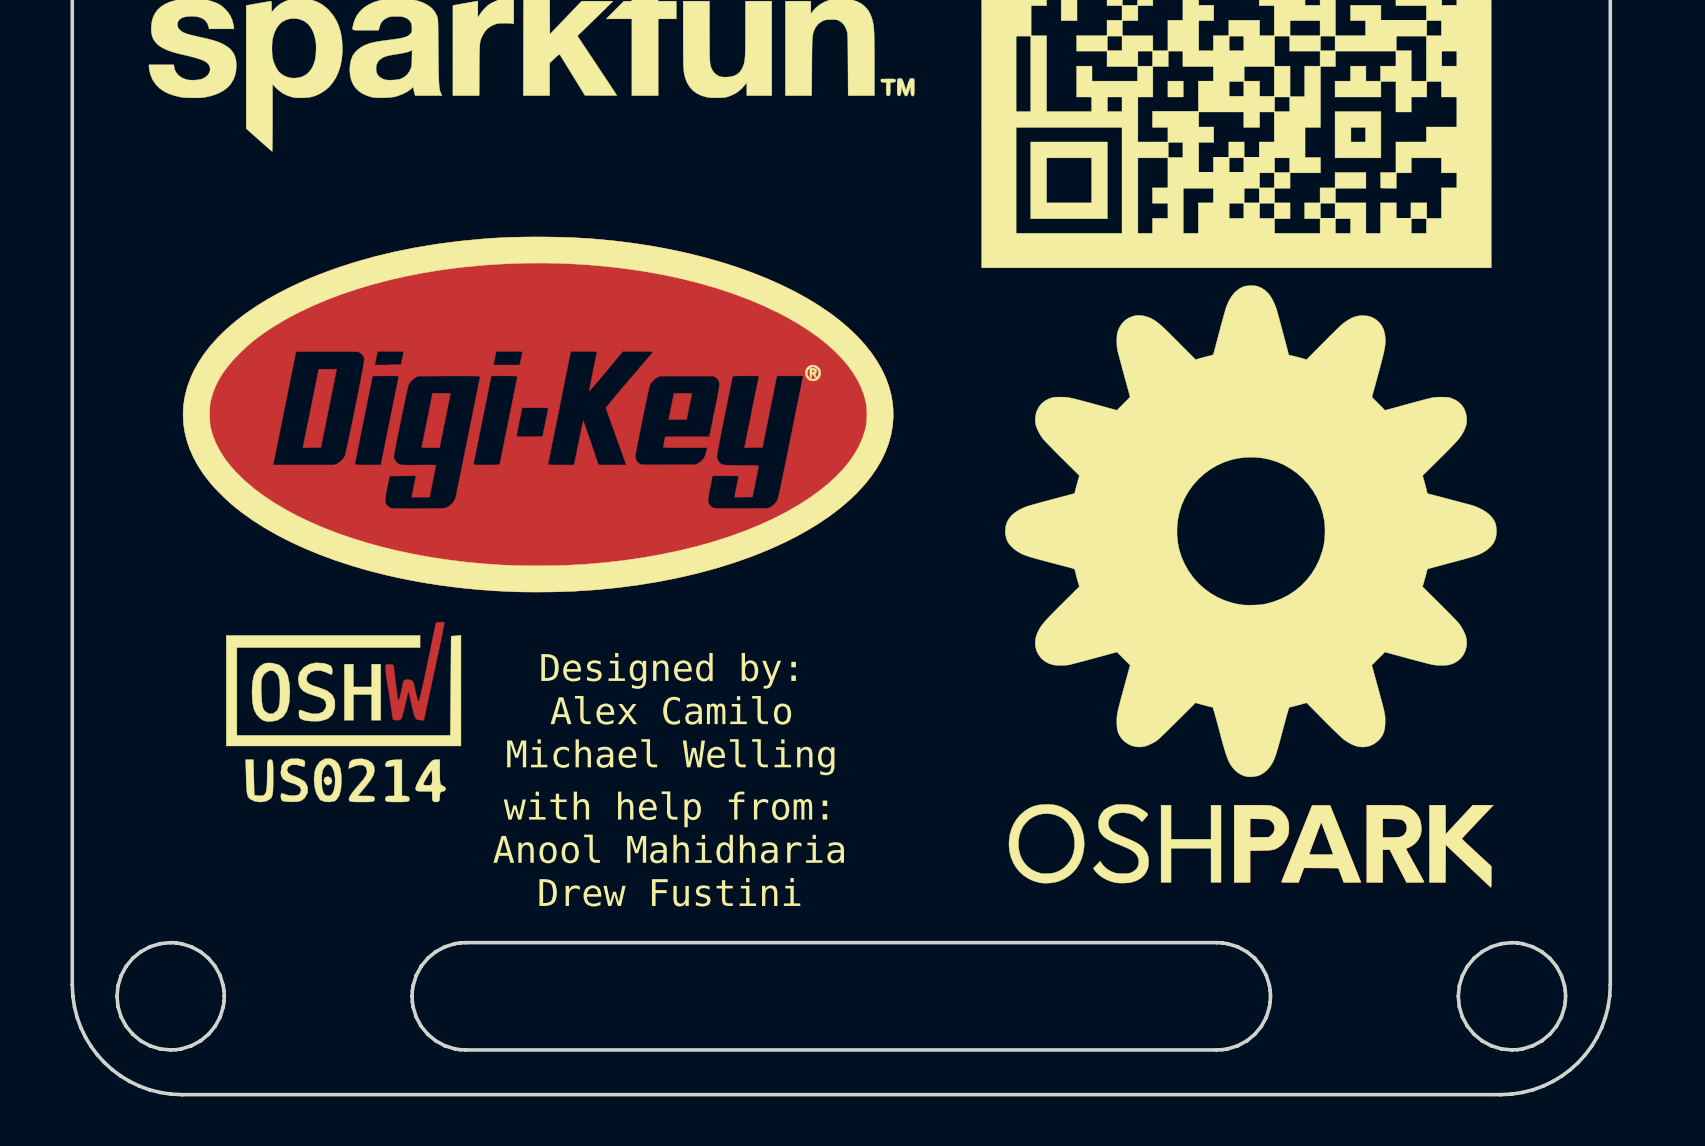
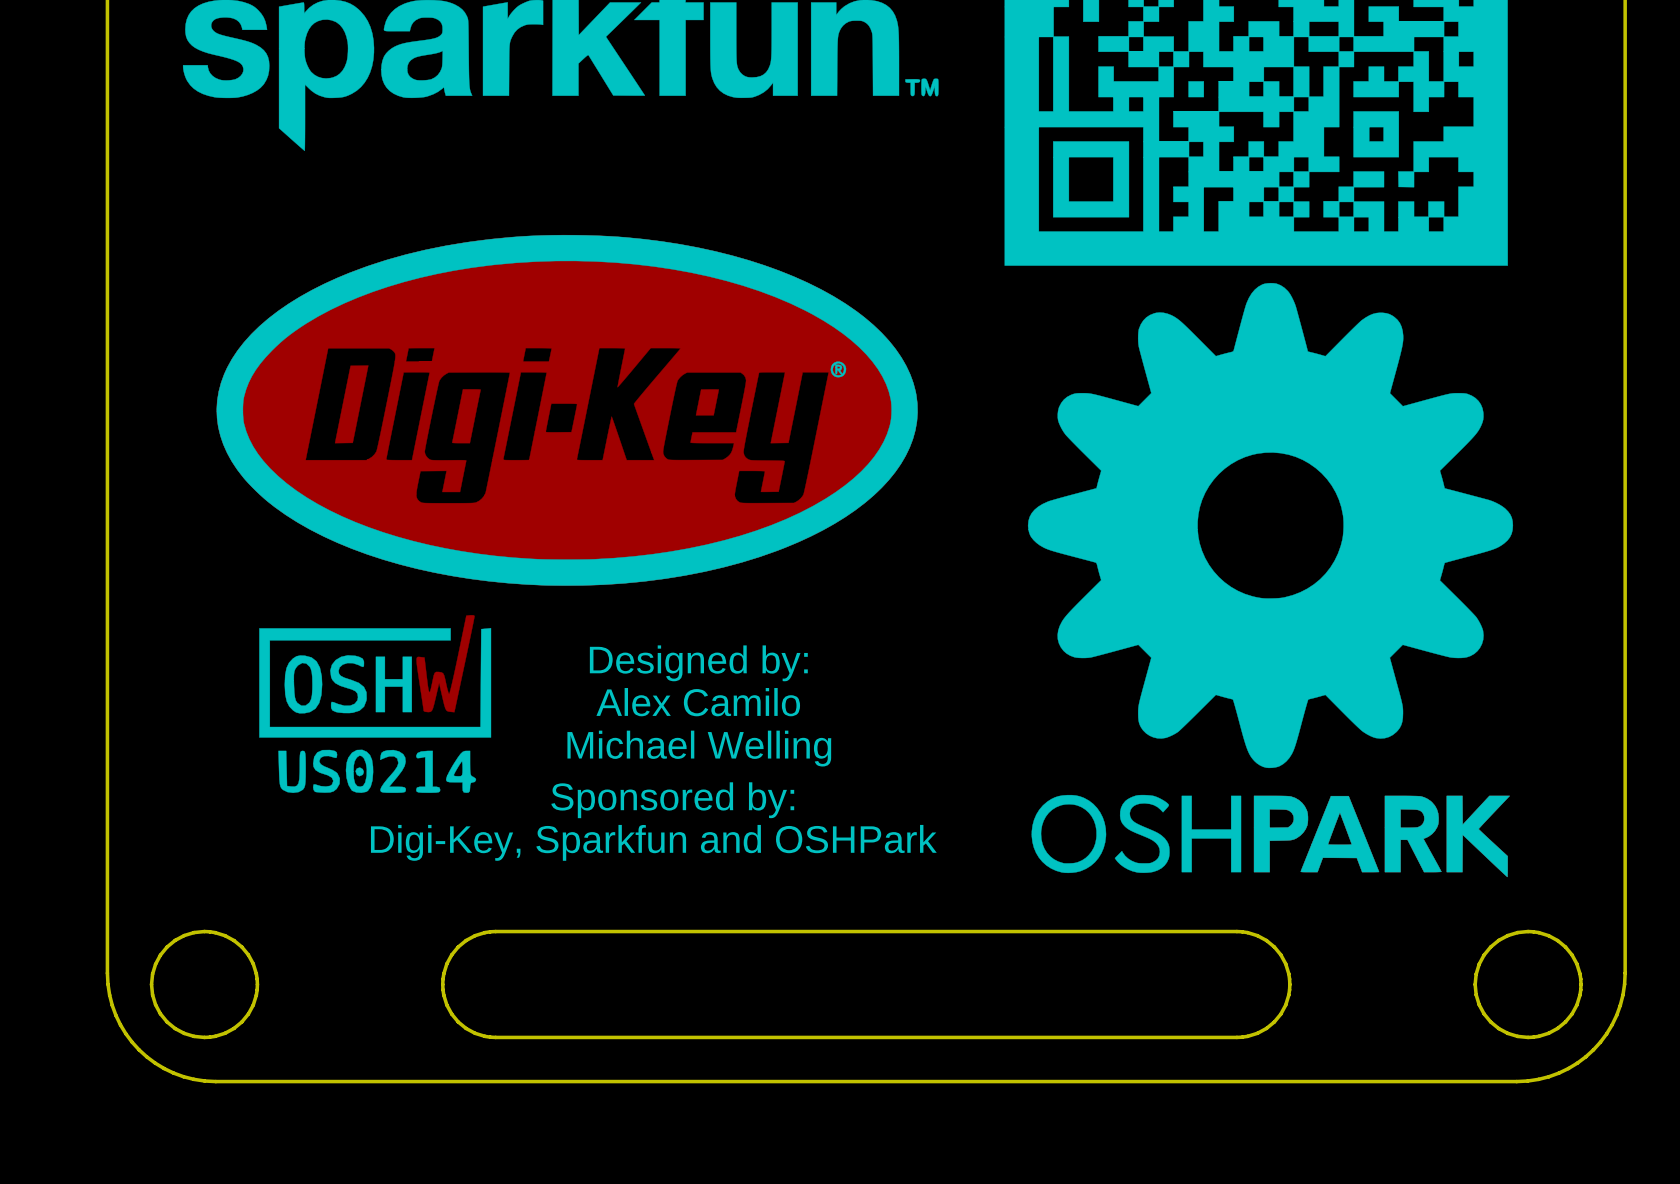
text: with help from: (665, 809) -> none
text: none -> Sponsored by: (672, 800)
text: Anool Mahidharia (668, 848) -> none
text: none -> Digi-Key, Sparkfun and OSHPark (653, 842)
text: Drew Fustini (669, 892) -> none

